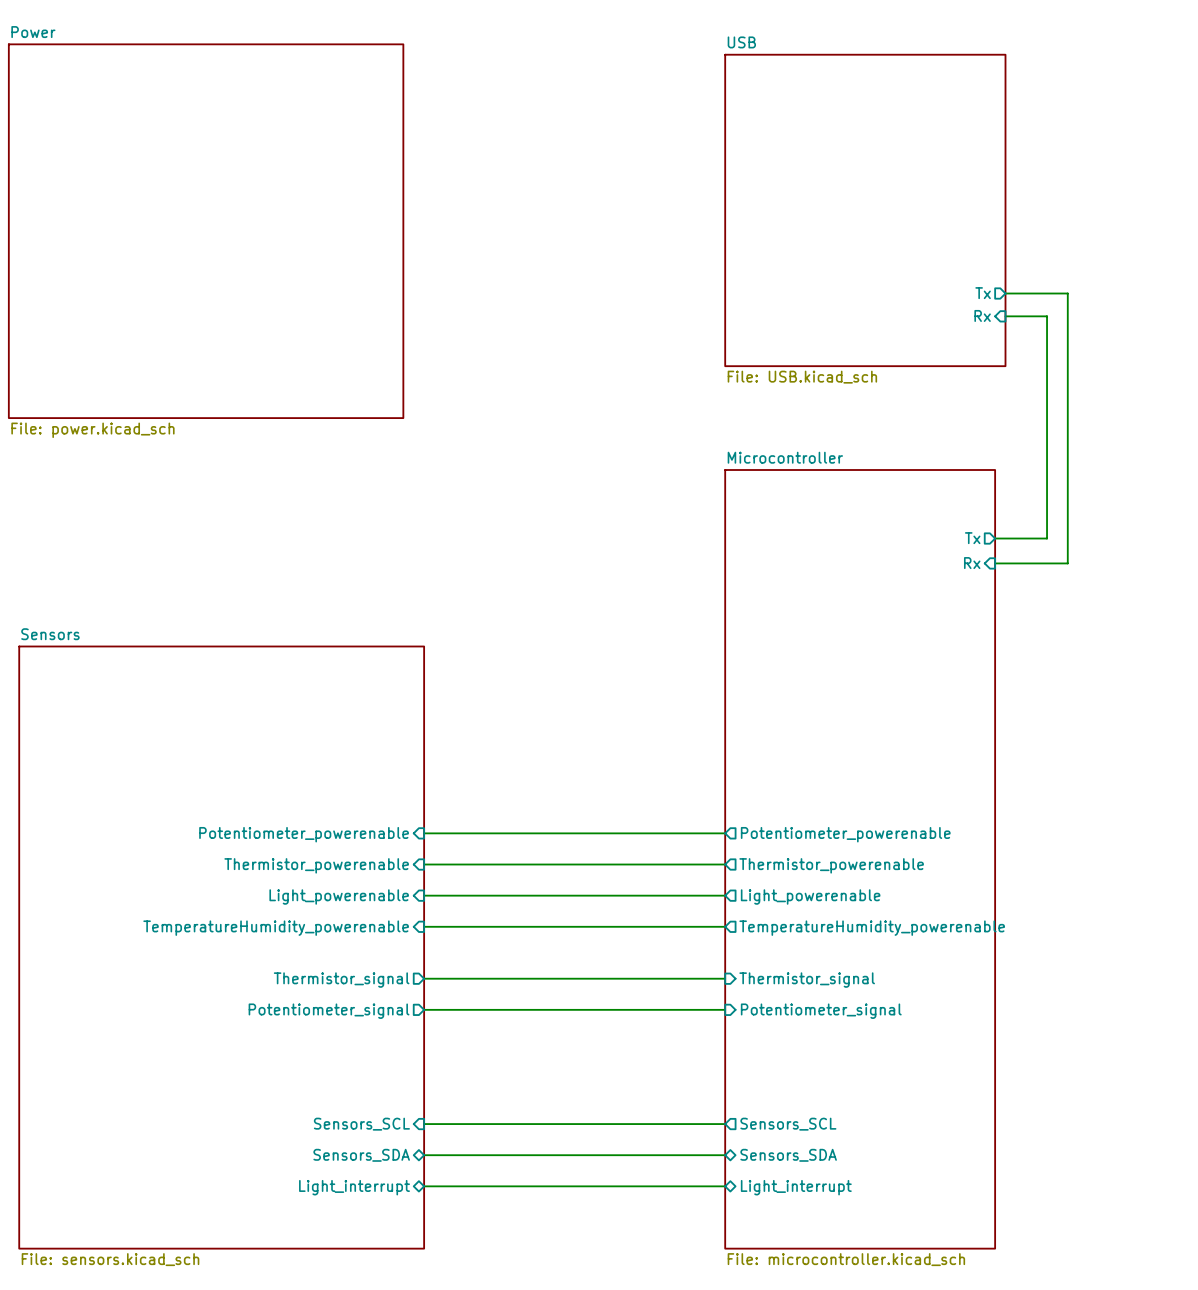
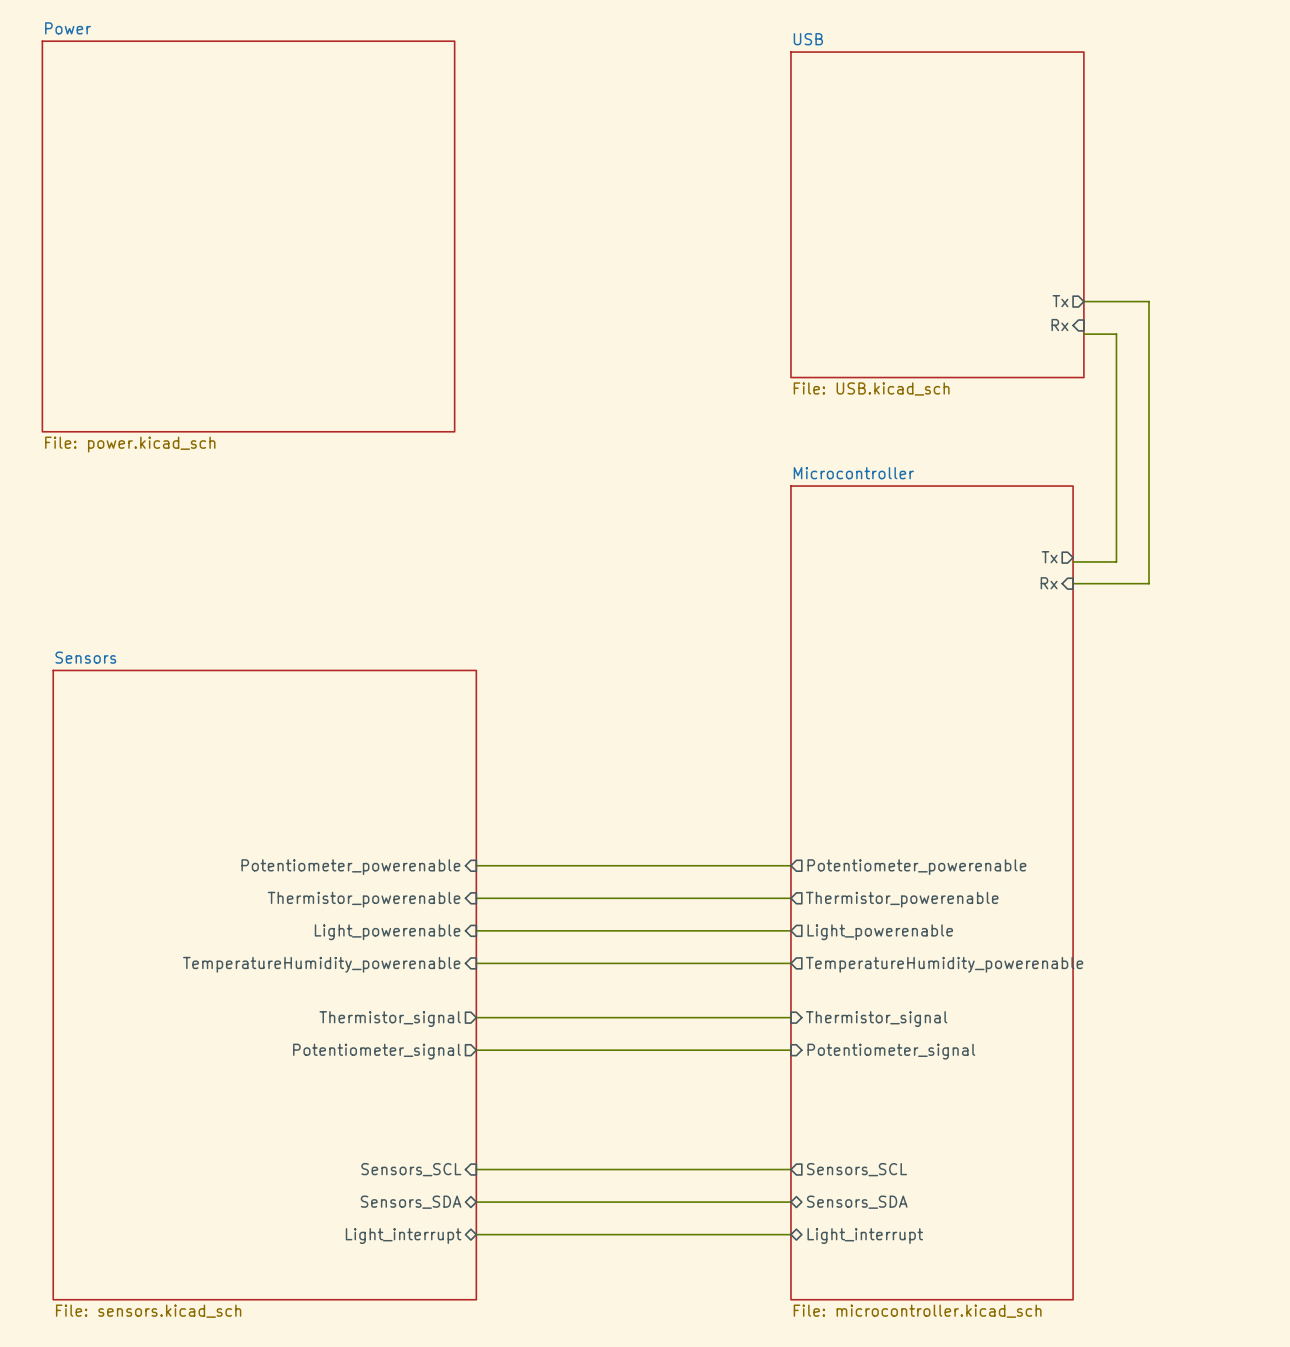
wire: (1005, 316) (1047, 316) (1047, 538) (995, 538) -> none
wire: none -> (1083, 334) (1116, 334) (1116, 561) (1073, 561)

